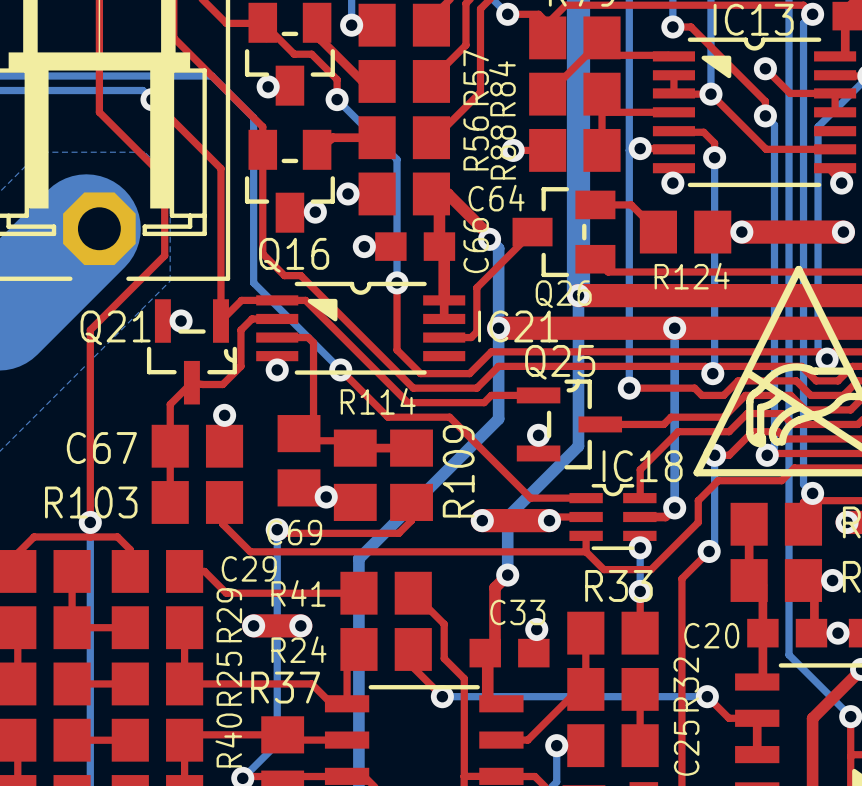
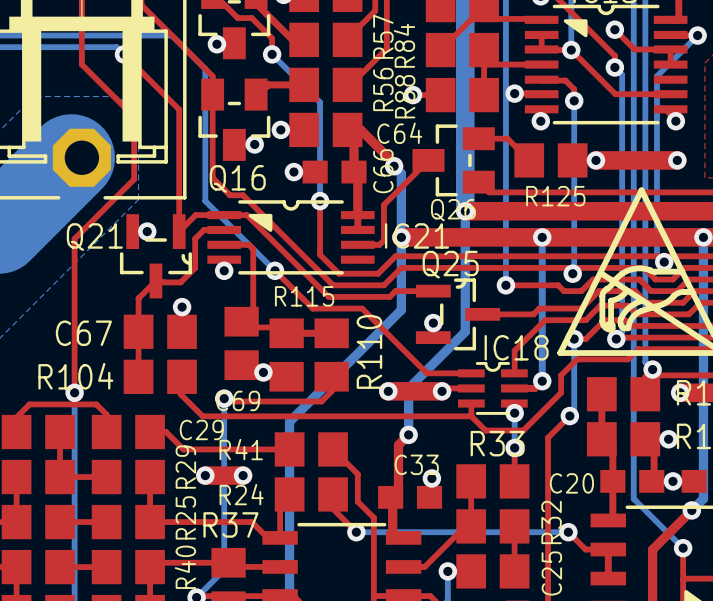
R124 name: R124 (692, 276) -> R125 (555, 196)
R114 name: R114 (378, 401) -> R115 (304, 296)
R109 name: R109 (458, 471) -> R110 (369, 351)
R103 name: R103 (91, 502) -> R104 (75, 376)

